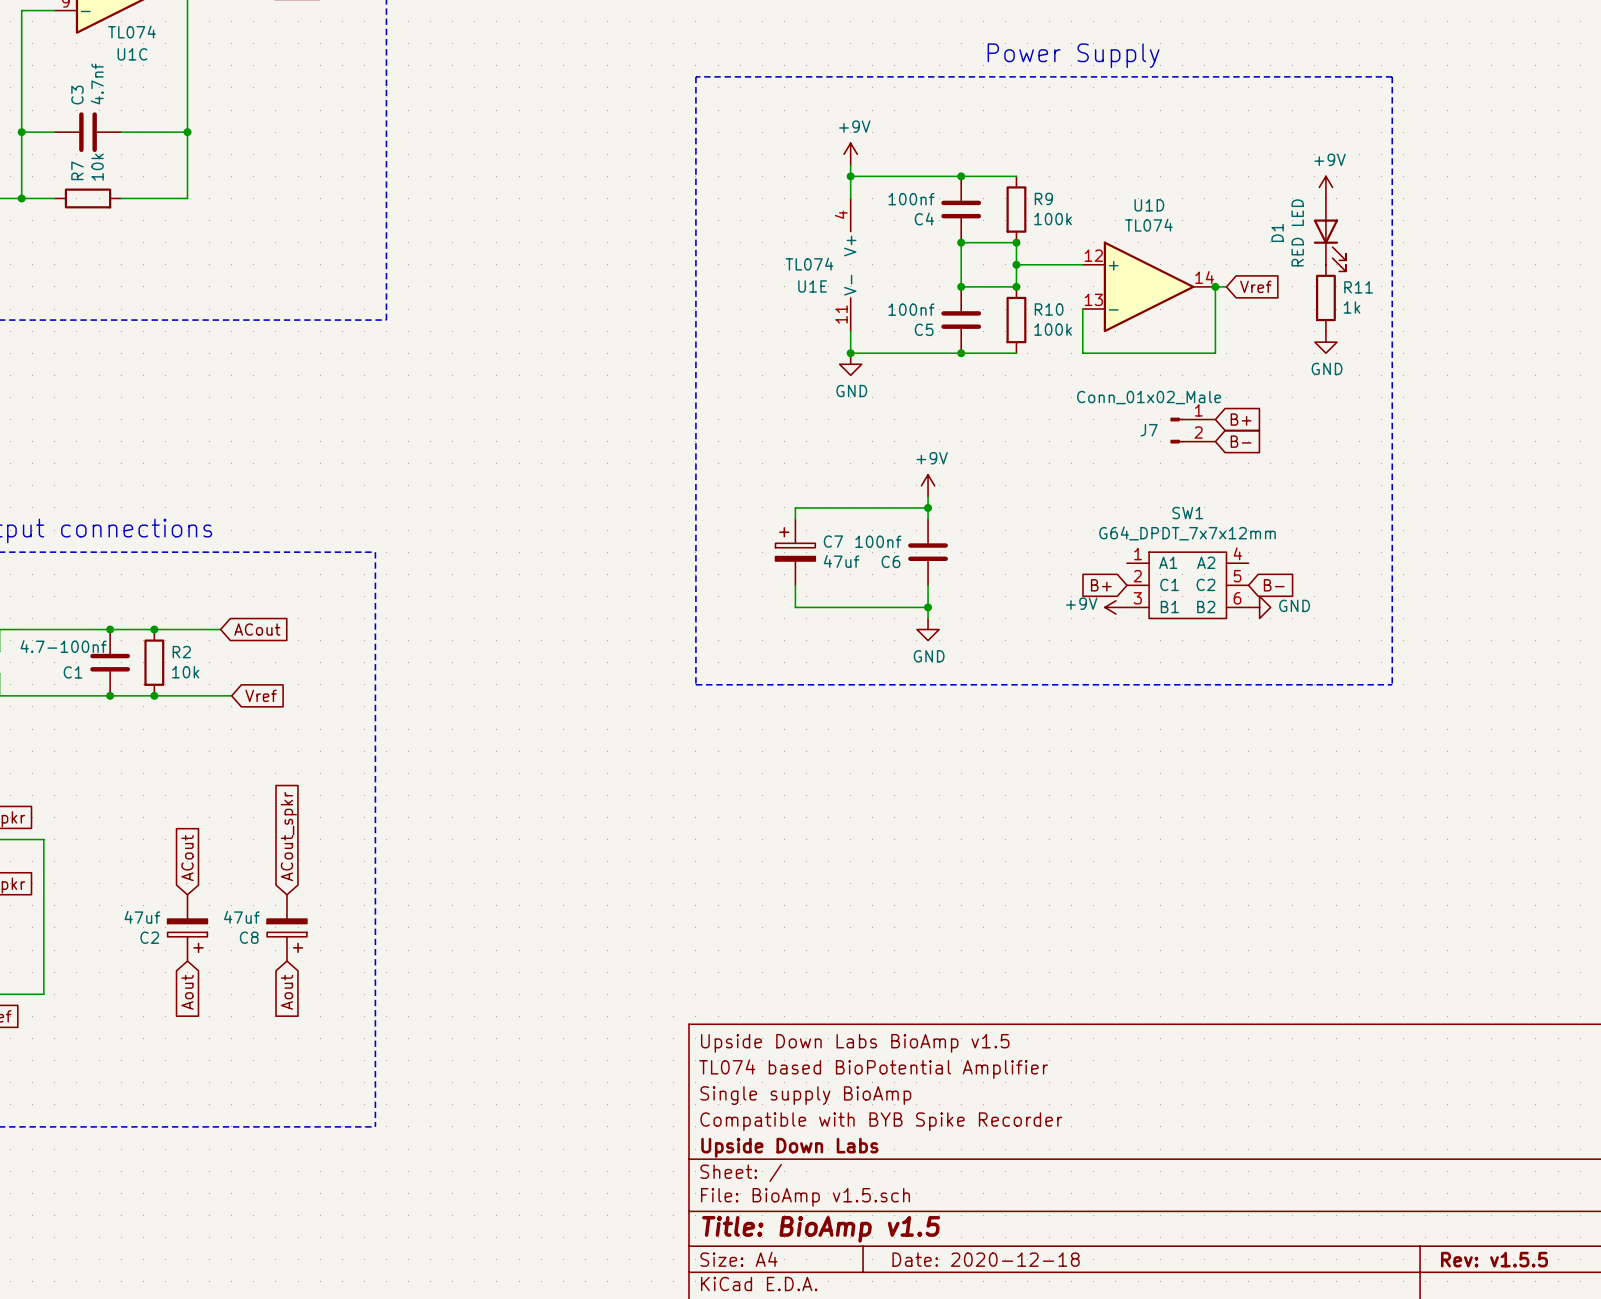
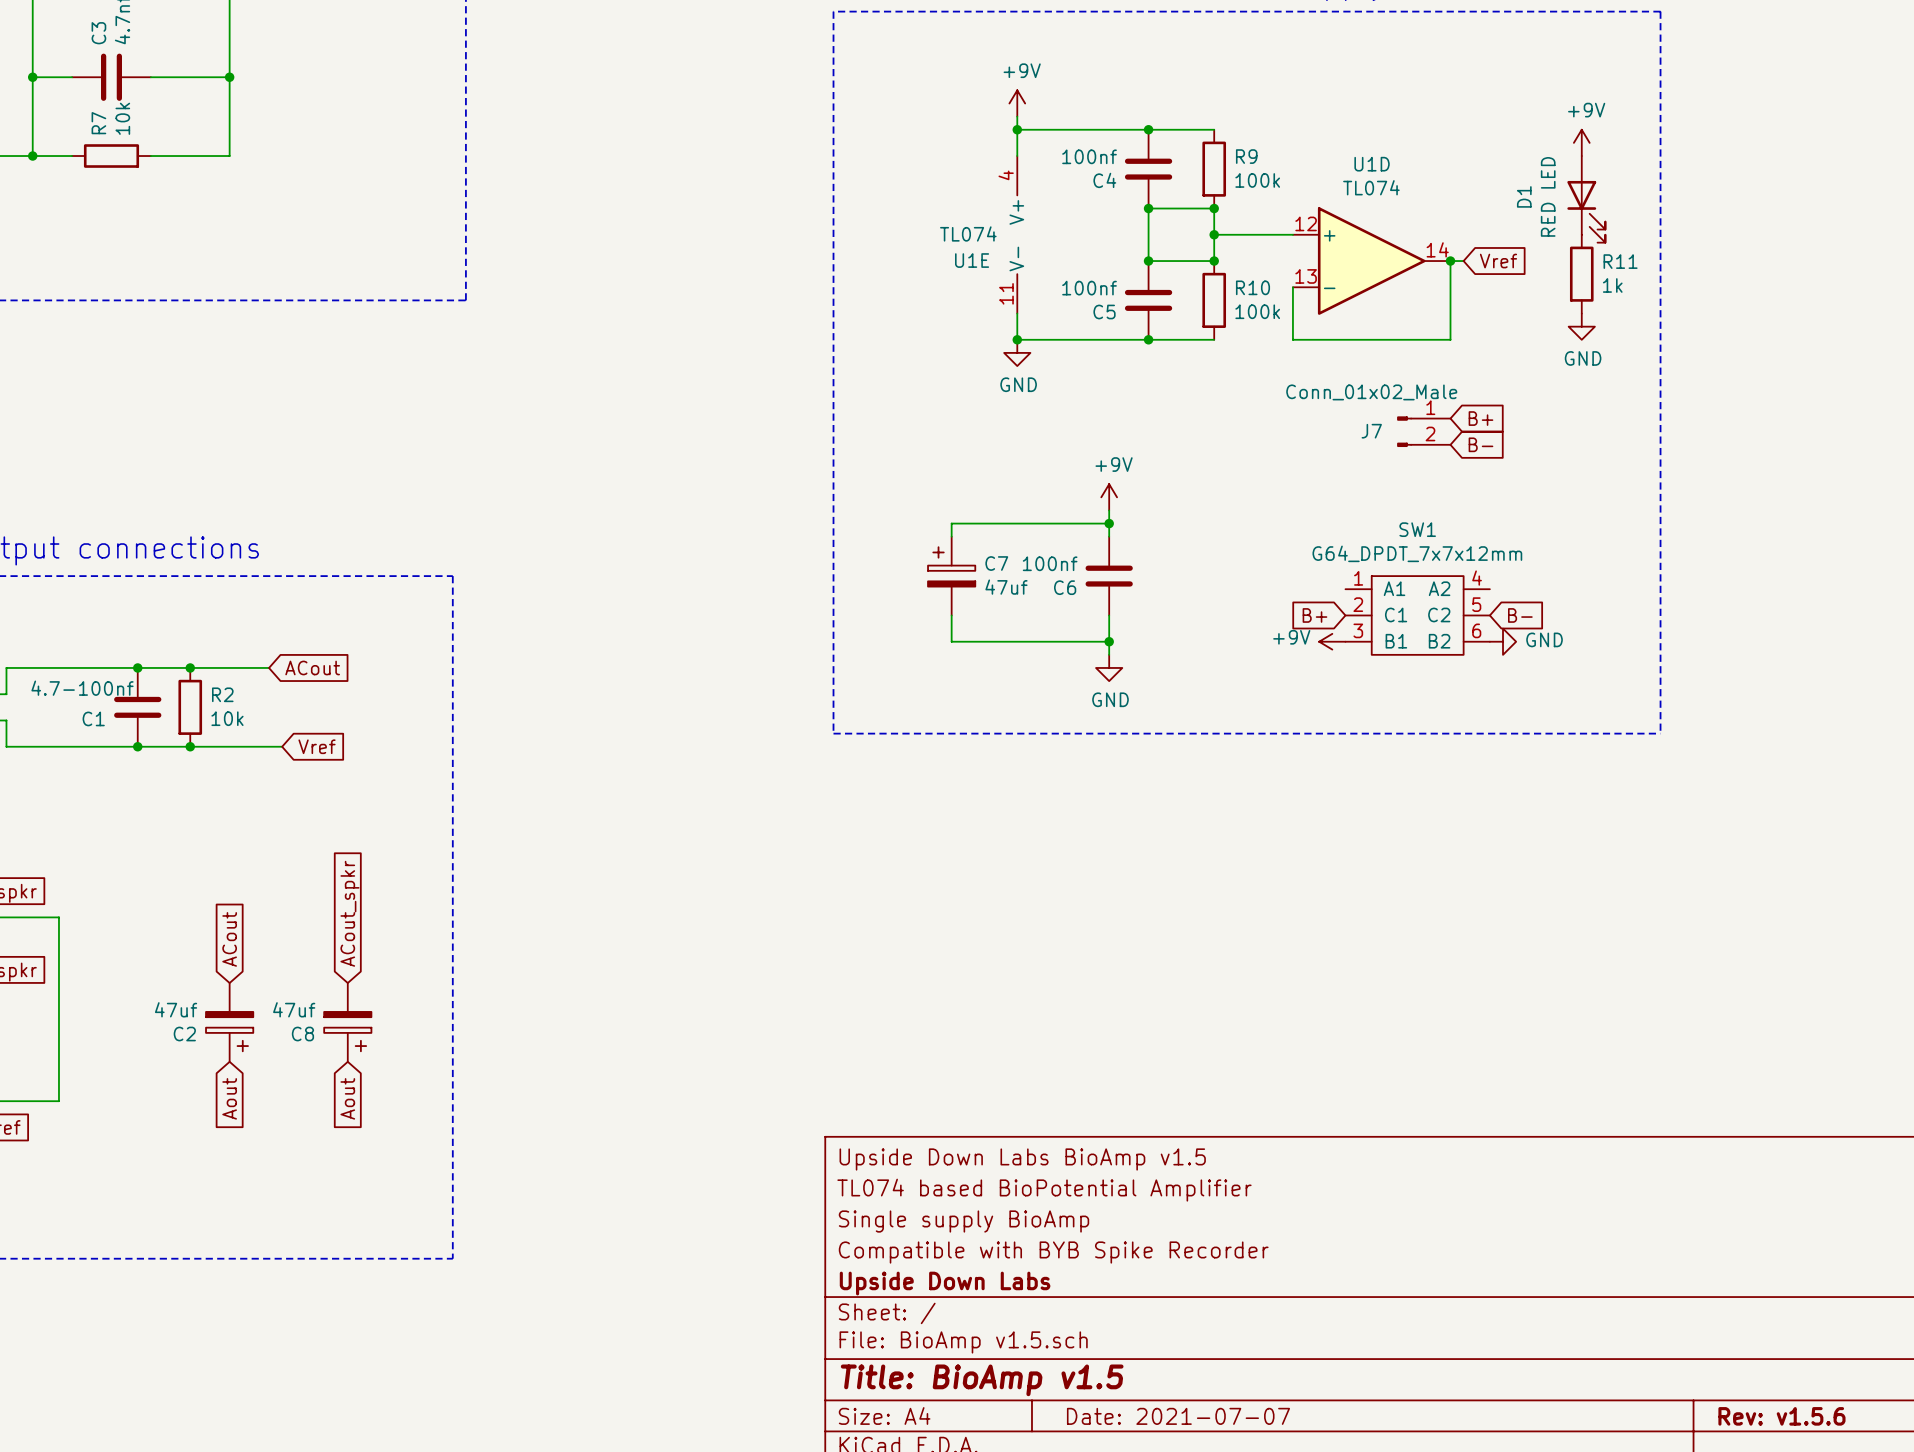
title block: Date: 2020-12-18 (986, 1259) -> Date: 2021-07-07 (1178, 1416)
title block: Rev: v1.5.5 (1494, 1259) -> Rev: v1.5.6 (1781, 1416)

